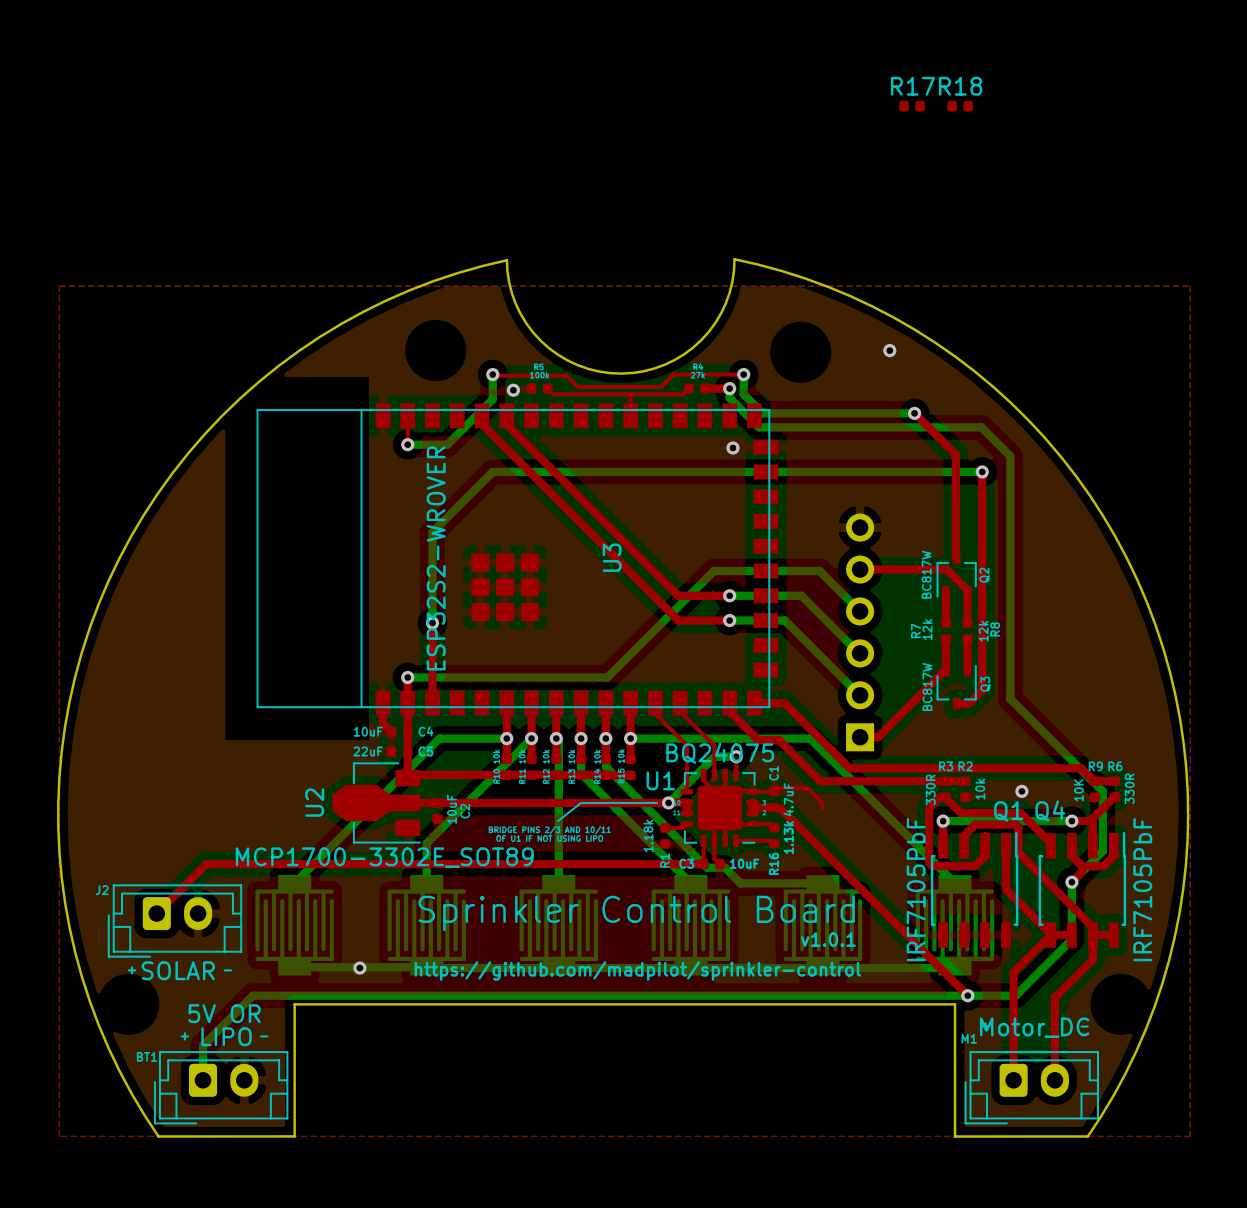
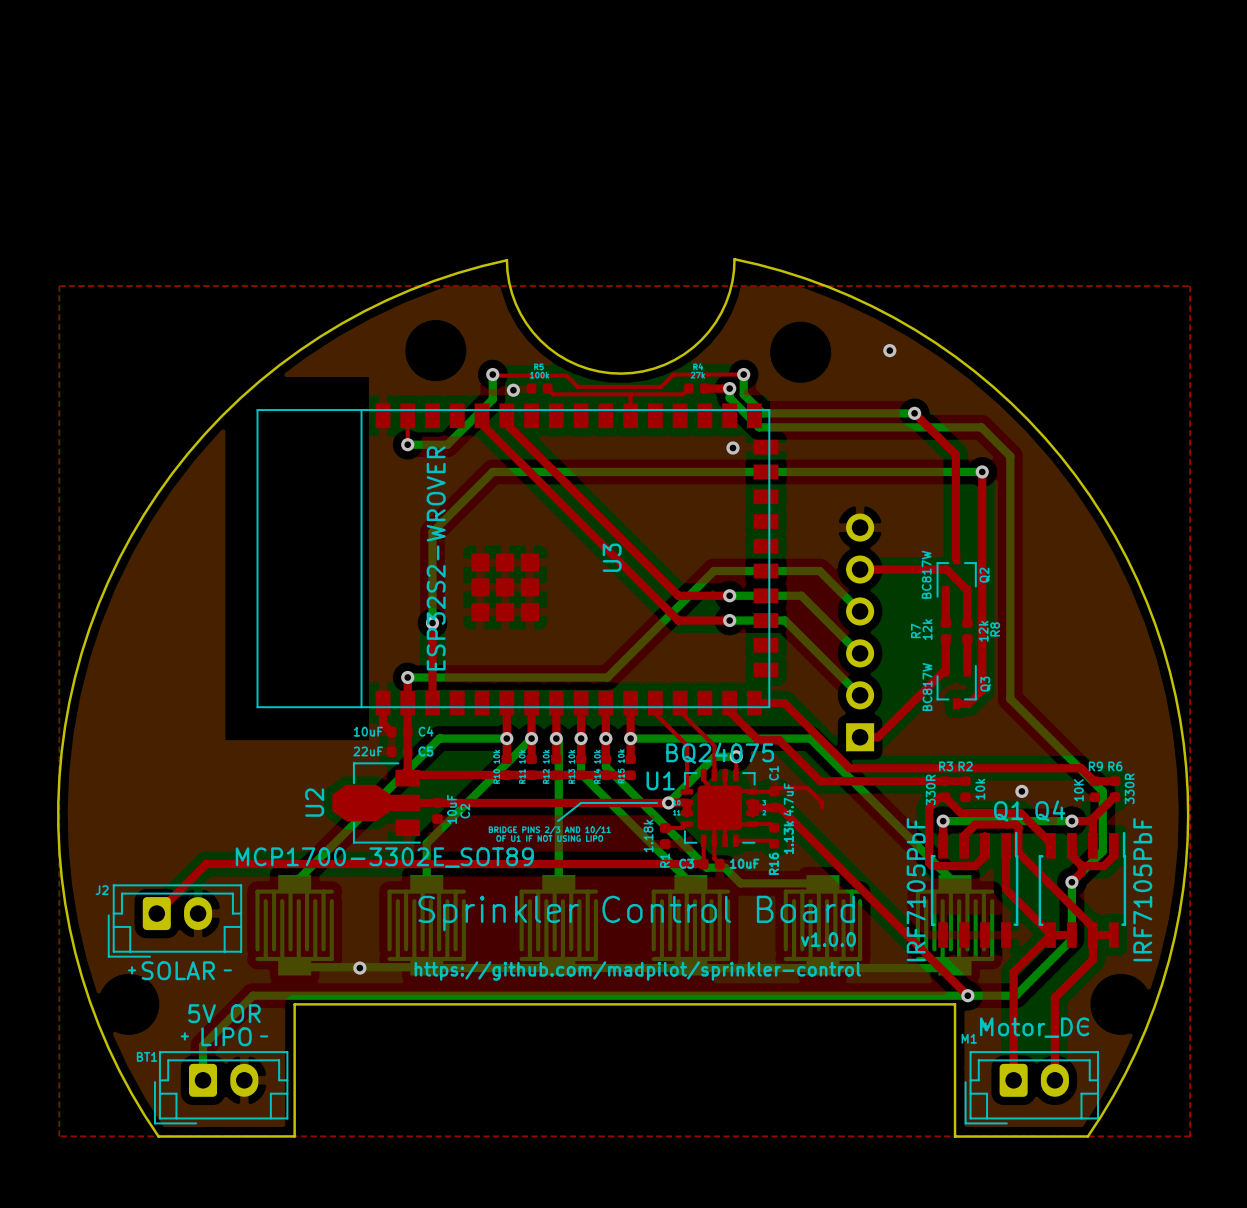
R17: (912, 106) -> none
R18: (960, 106) -> none
text: v1.0.1 (828, 939) -> v1.0.0 (828, 939)

